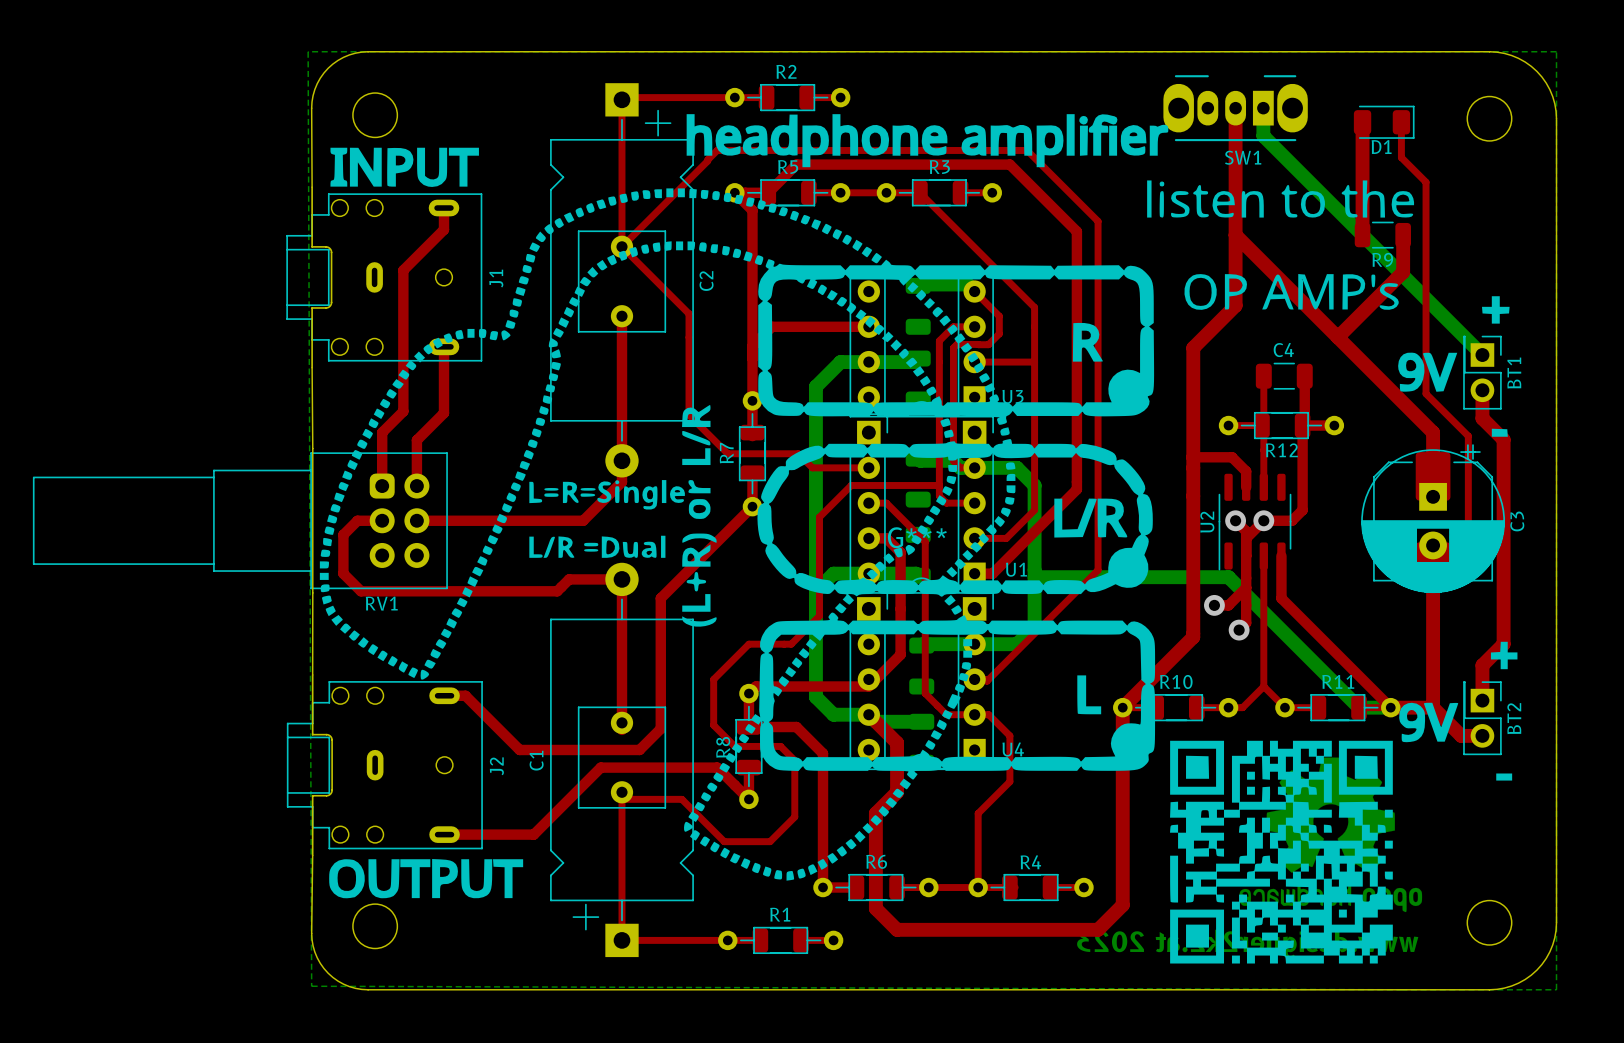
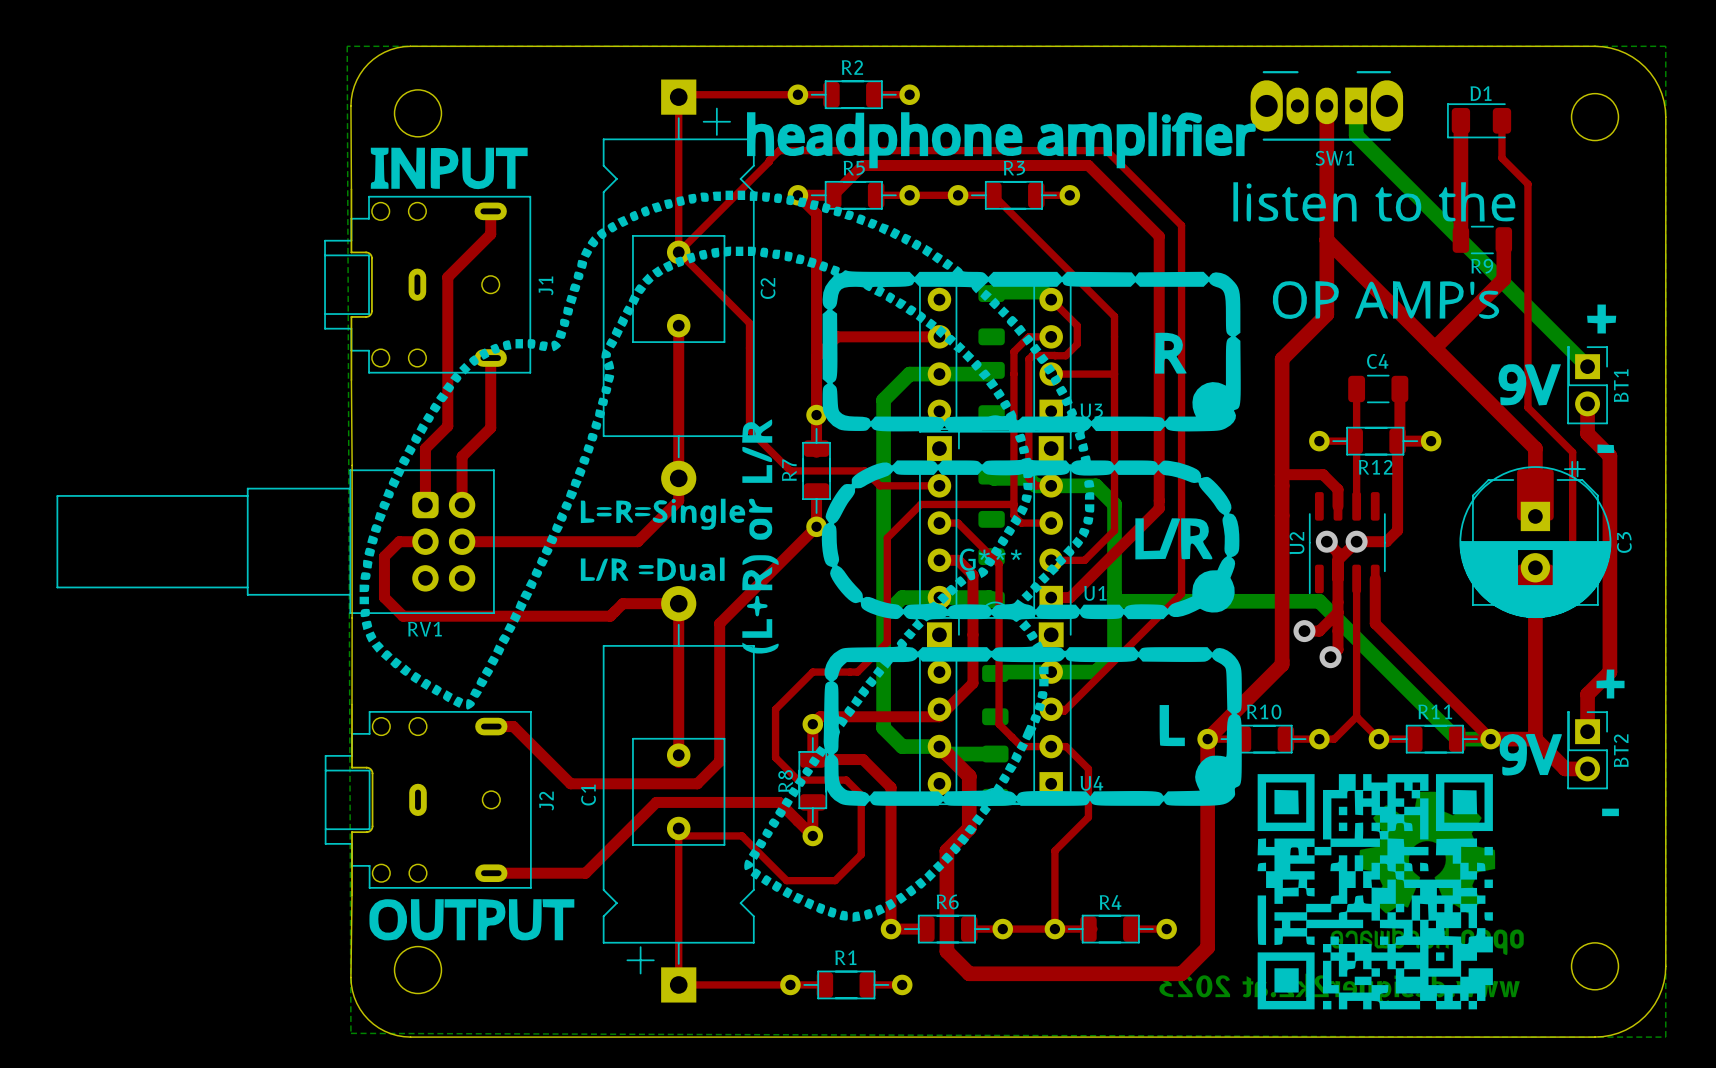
D1 rotation: 0° (1384, 122) -> 180° (1479, 120)

